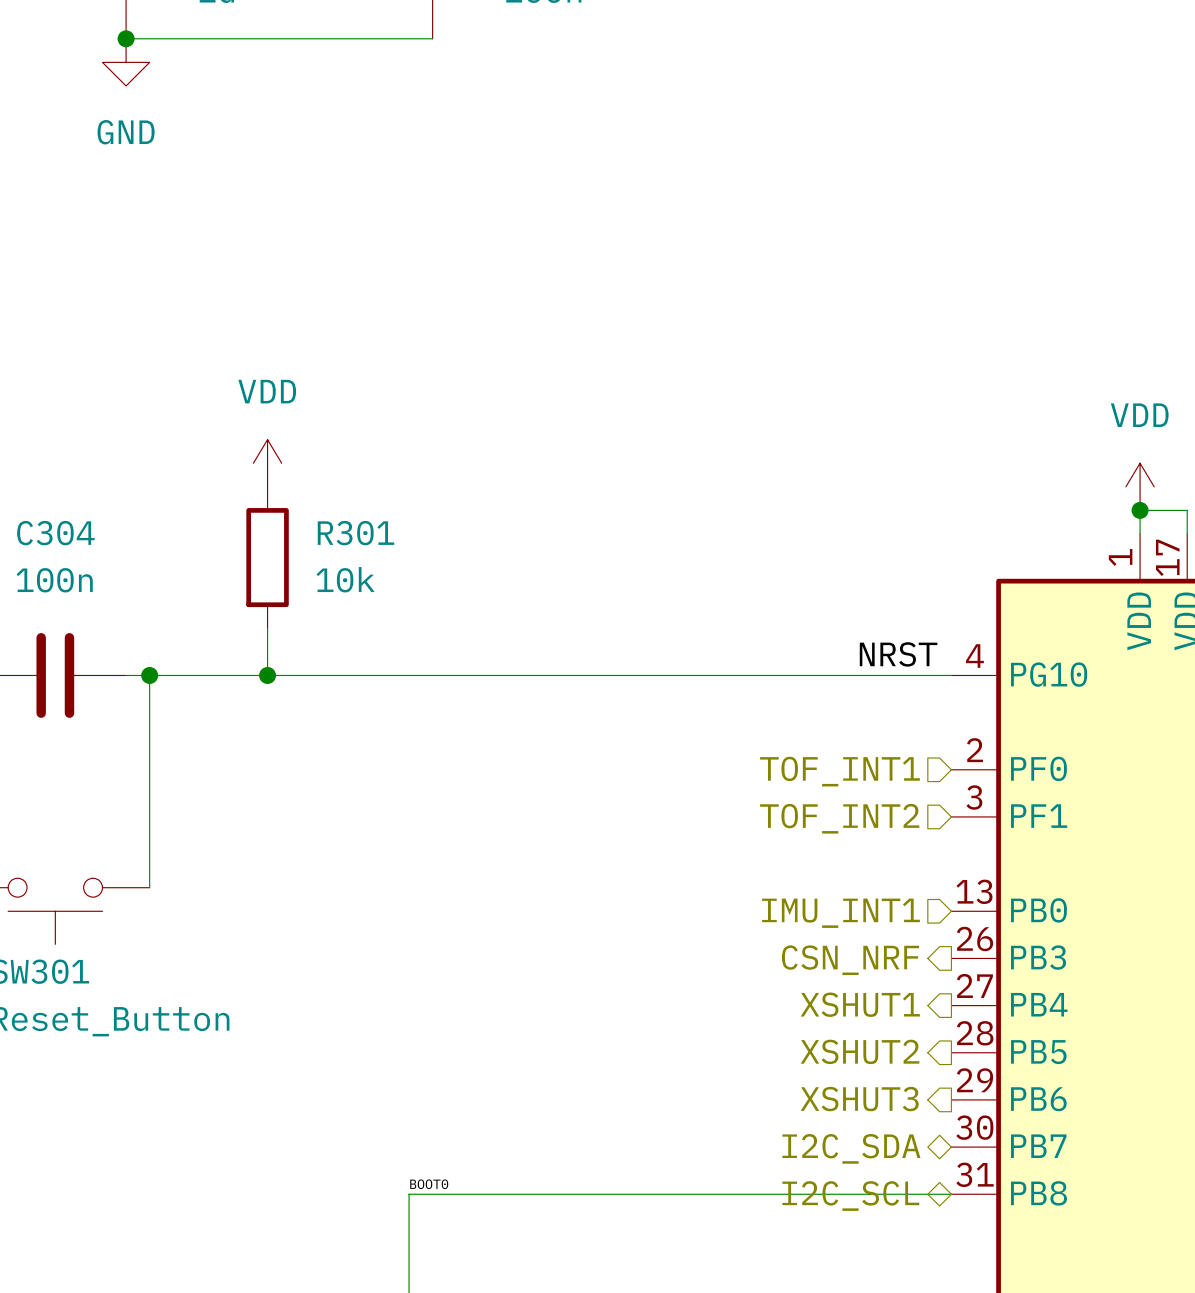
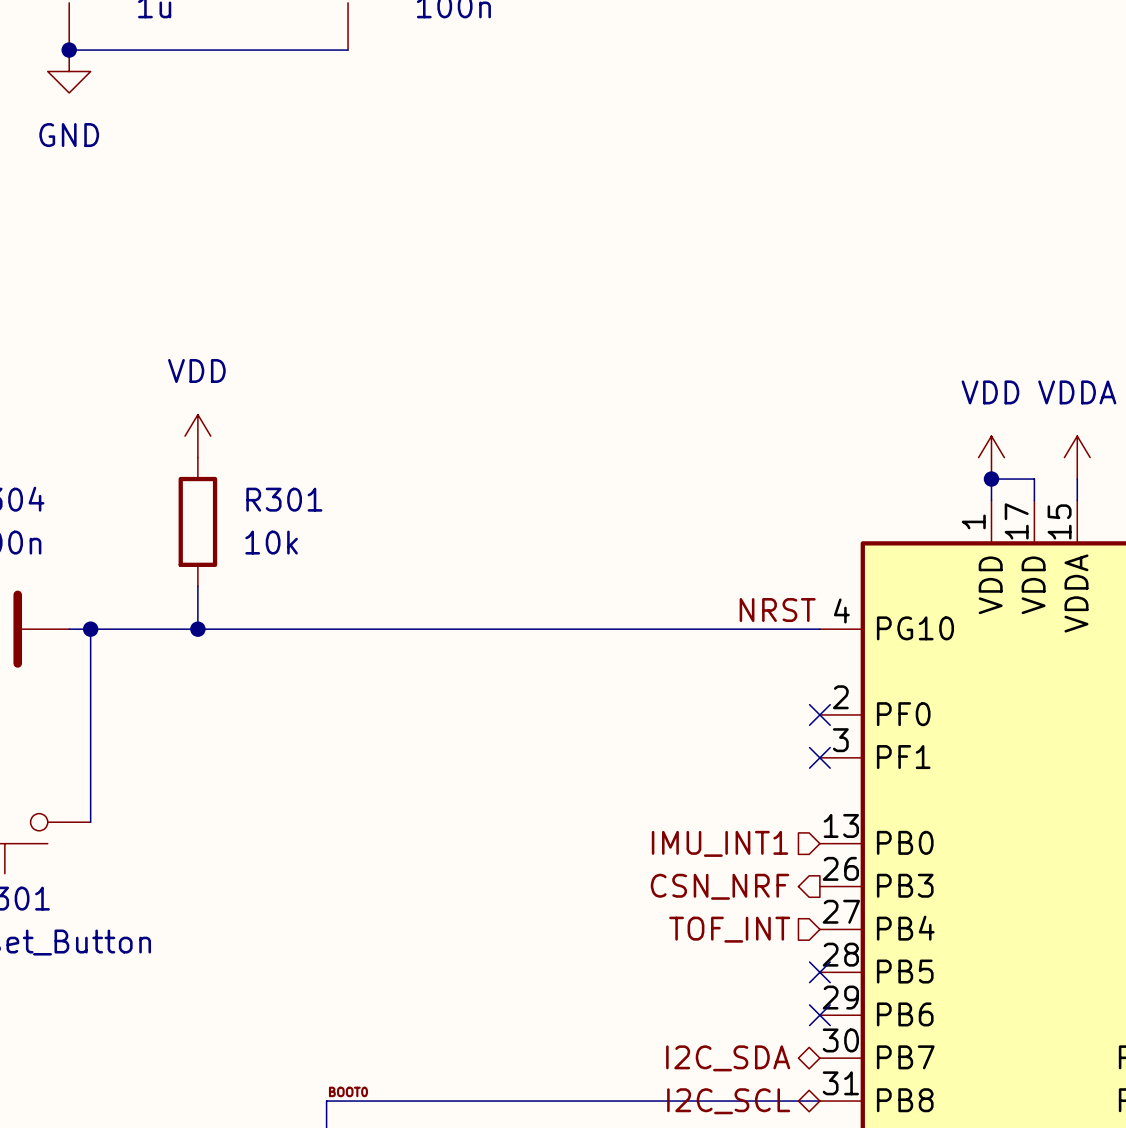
no-connect mark: none -> (819, 714)
hierarchical label: TOF_INT1 (840, 771) -> none
no-connect mark: none -> (819, 757)
hierarchical label: TOF_INT2 (839, 818) -> none
hierarchical label shape: output (860, 1004) -> input (729, 929)
hierarchical label: XSHUT1 (860, 1004) -> TOF_INT (729, 929)
hierarchical label: XSHUT2 (860, 1051) -> none
no-connect mark: none -> (819, 972)
hierarchical label: XSHUT3 (859, 1099) -> none
no-connect mark: none -> (819, 1015)

